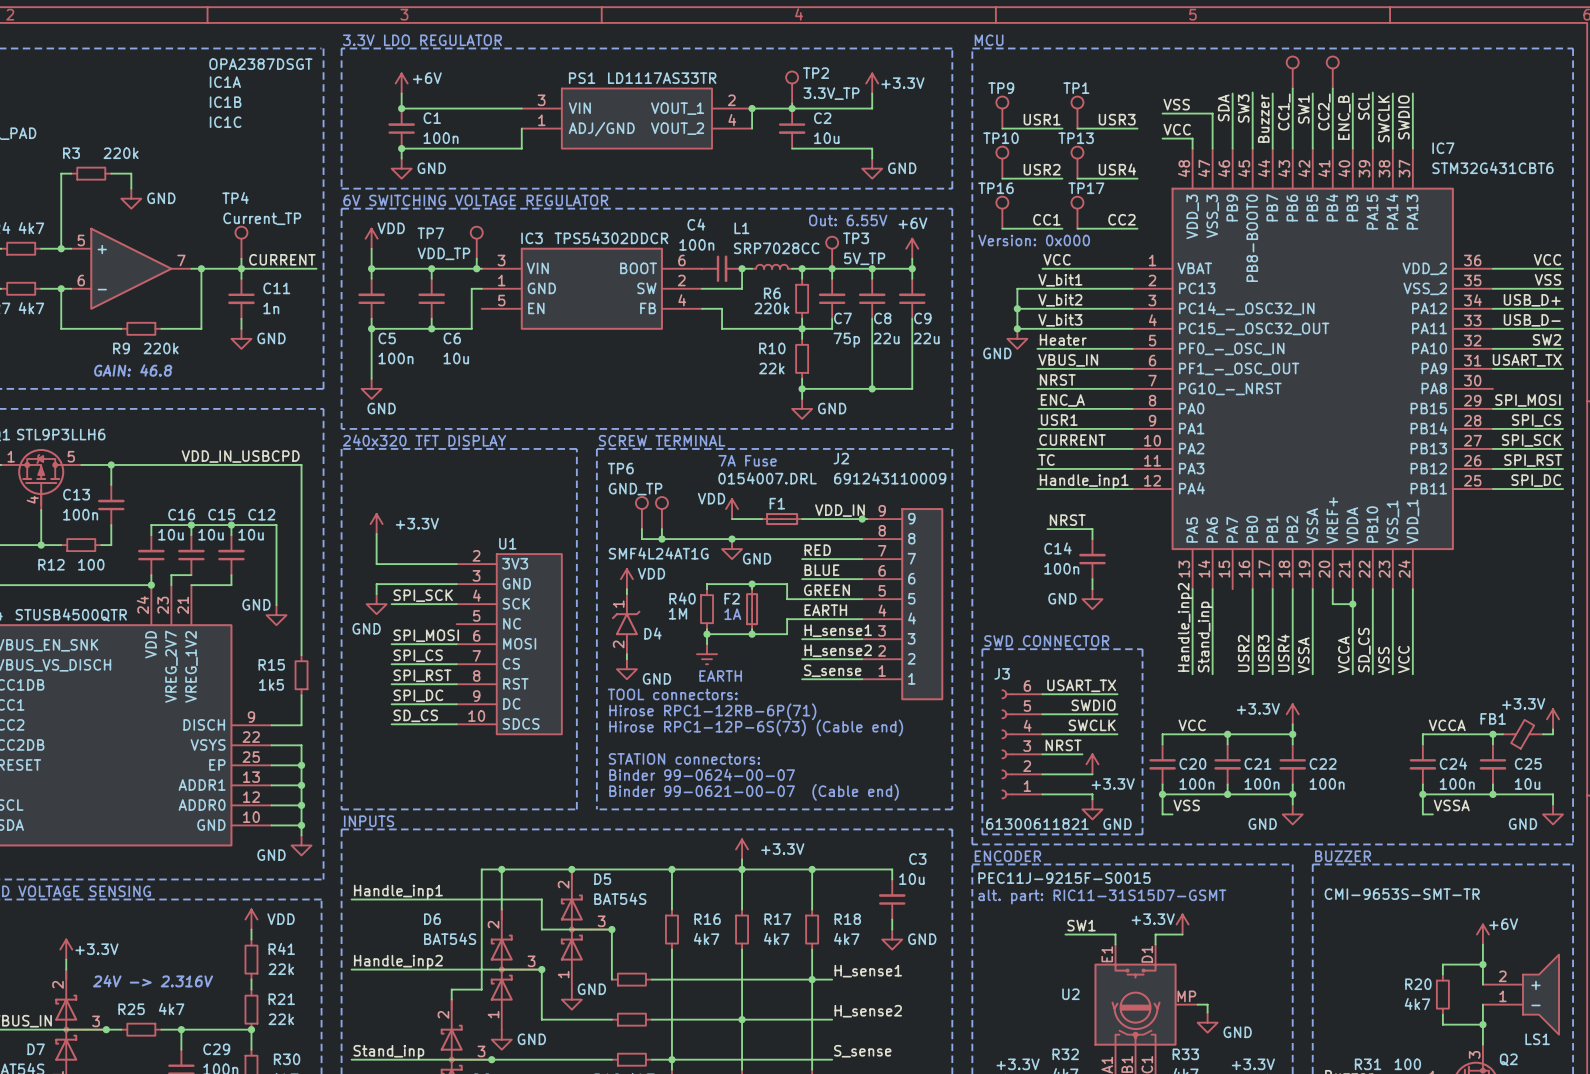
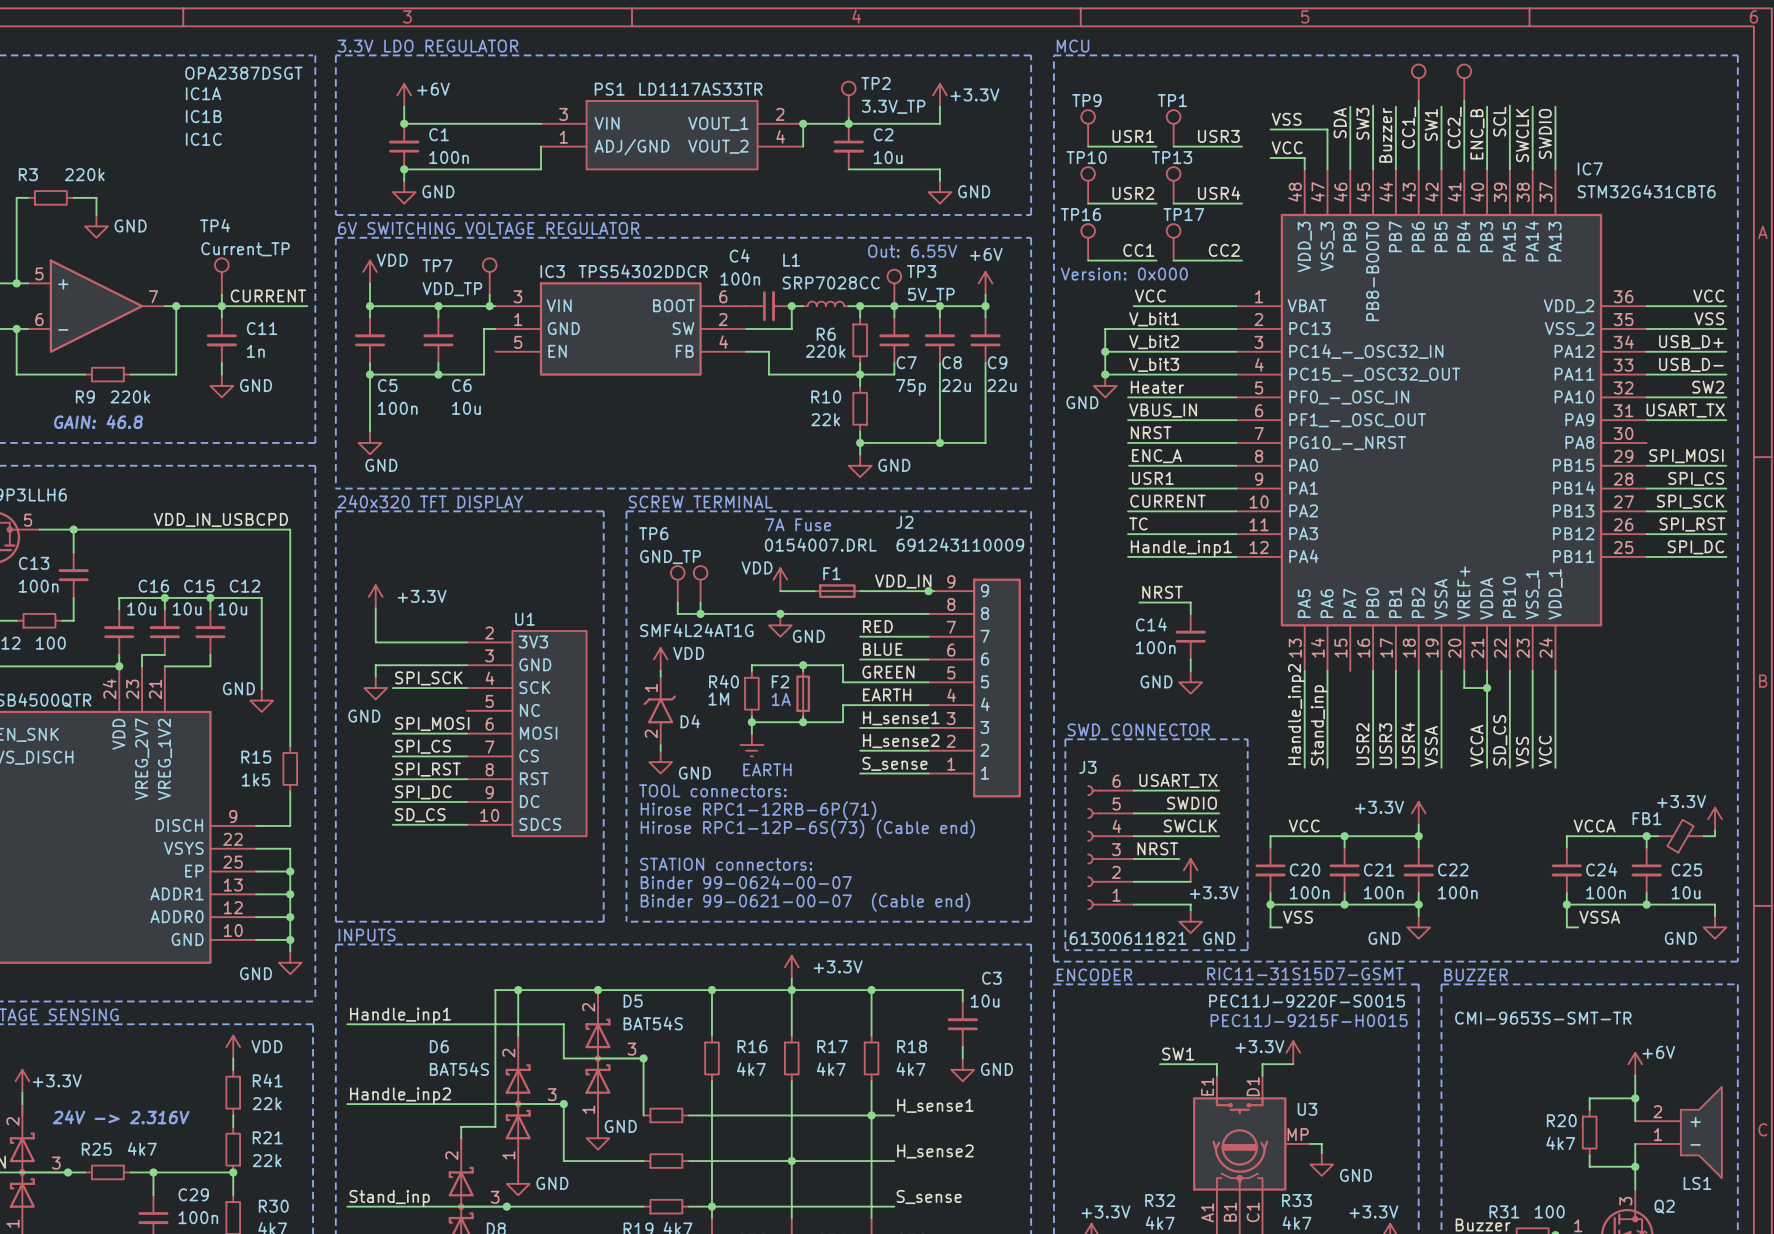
text: none -> RIC11-31S15D7-GSMT (1305, 973)
U2 value: PEC11J-9215F-S0015 (1064, 878) -> PEC11J-9220F-S0015 (1307, 1001)
text: alt. part: RIC11-31S15D7-GSMT (1102, 896) -> none
text: none -> PEC11J-9215F-H0015 (1309, 1020)
U2 name: U2 (1070, 994) -> U3 (1307, 1109)

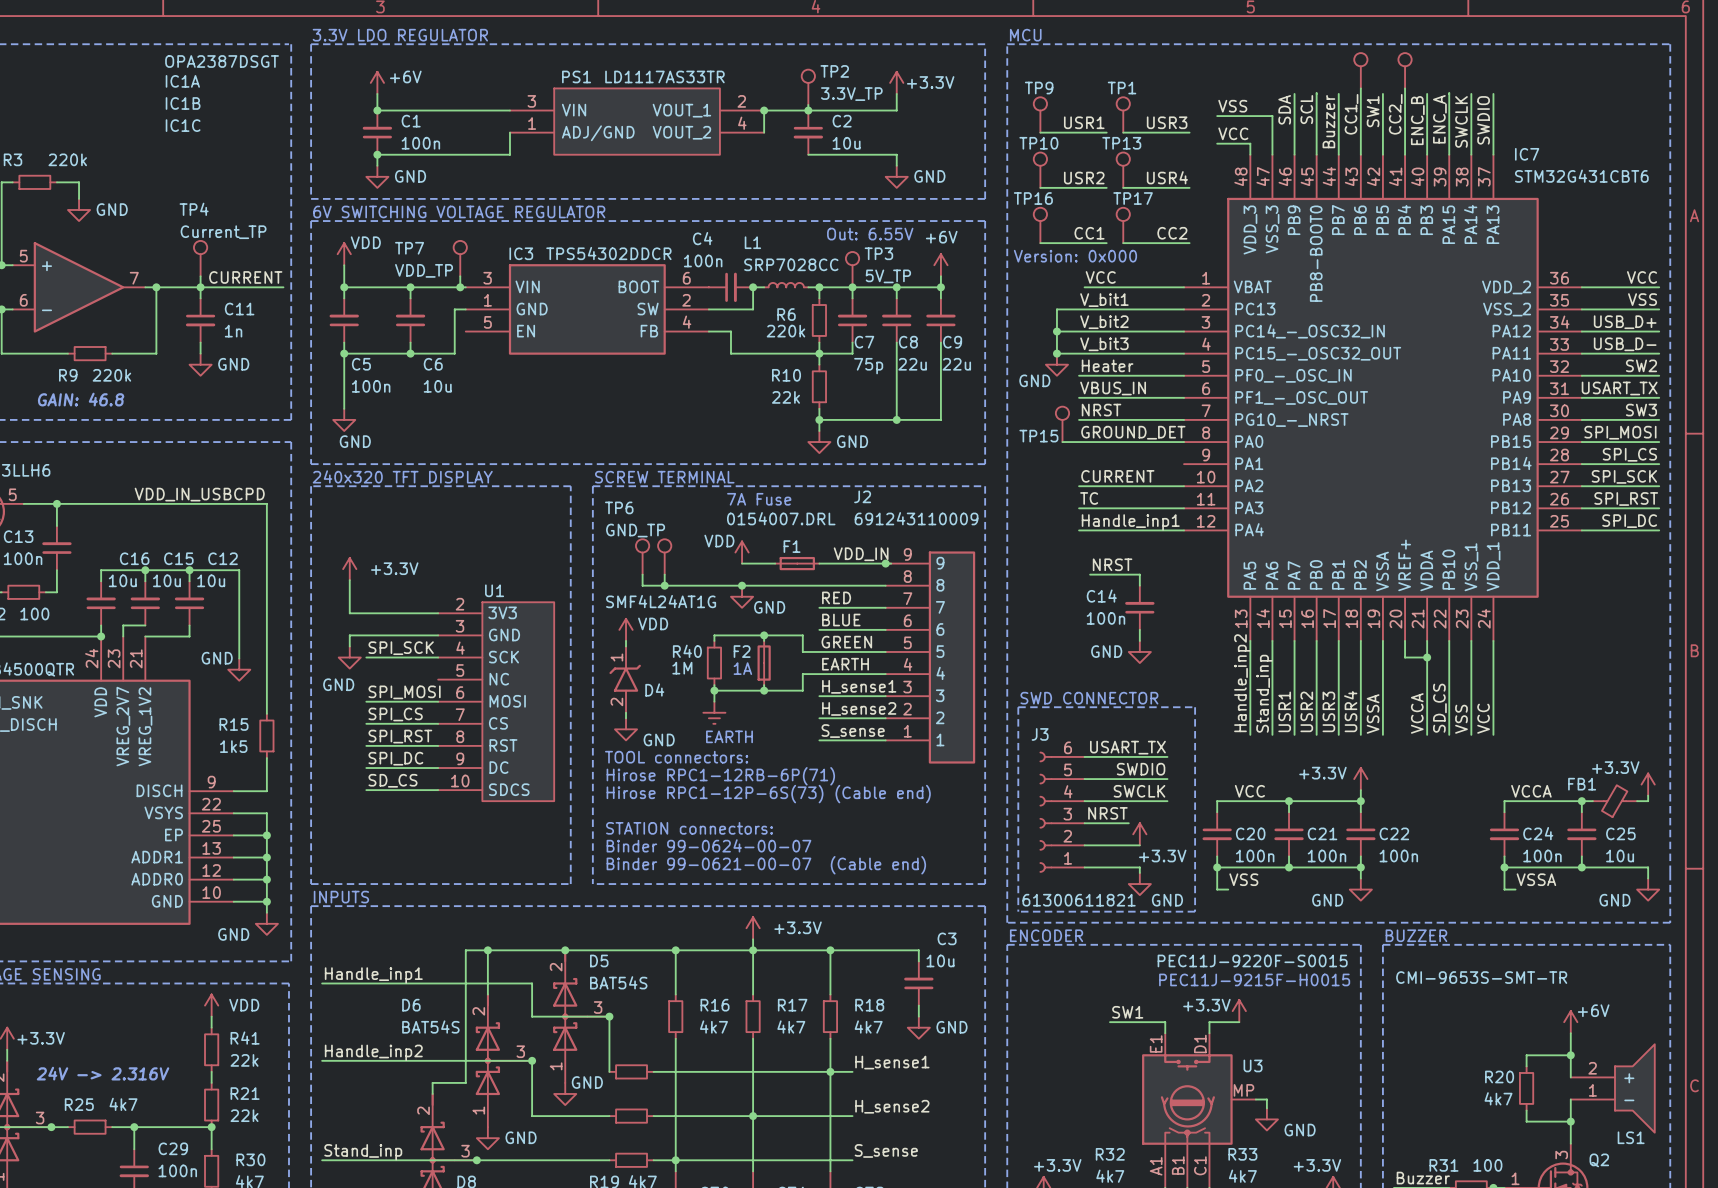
label: SCL (1499, 121) -> ENC_A (1439, 119)
label: SW3 (1362, 123) -> SCL (1306, 109)
label: none -> SW3 (1641, 410)
wire: none -> (1581, 419) (1659, 419)
TP15: none -> (1062, 424)
label: ENC_A (1156, 456) -> GROUND_DET (1133, 432)
wire: none -> (1062, 442) (1080, 442)
label: USR1 (1152, 478) -> none
wire: (1129, 488) (1236, 488) -> none
wire: none -> (1294, 640) (1294, 734)
label: none -> USR1 (1284, 711)
text: RIC11-31S15D7-GSMT (1305, 973) -> none

